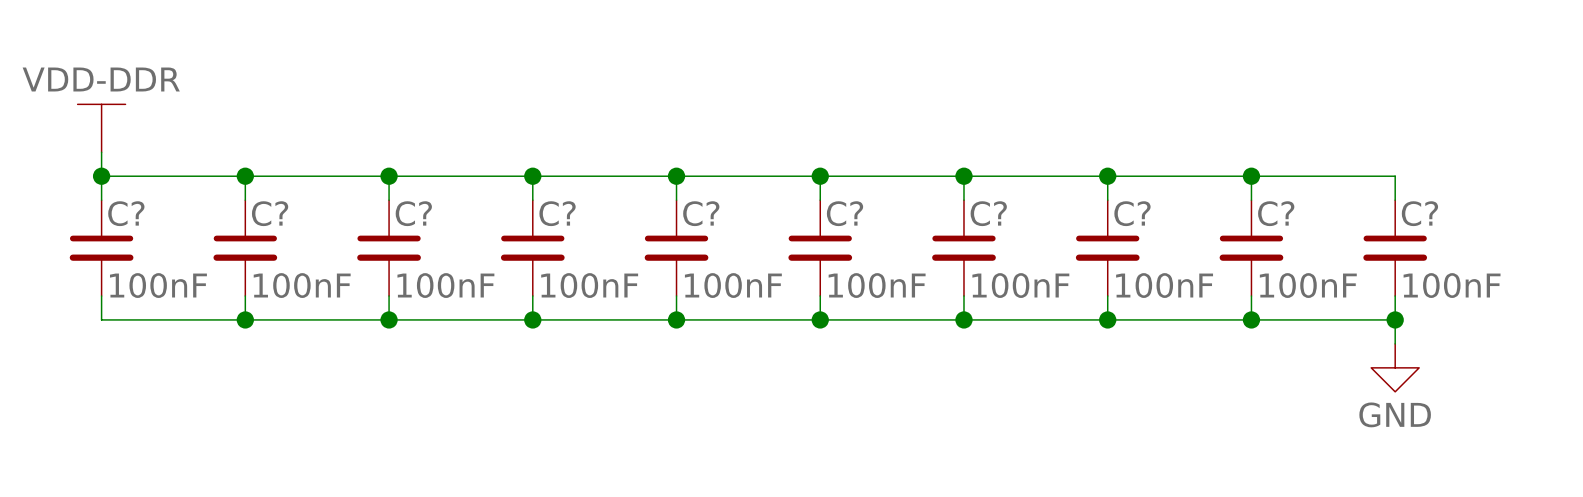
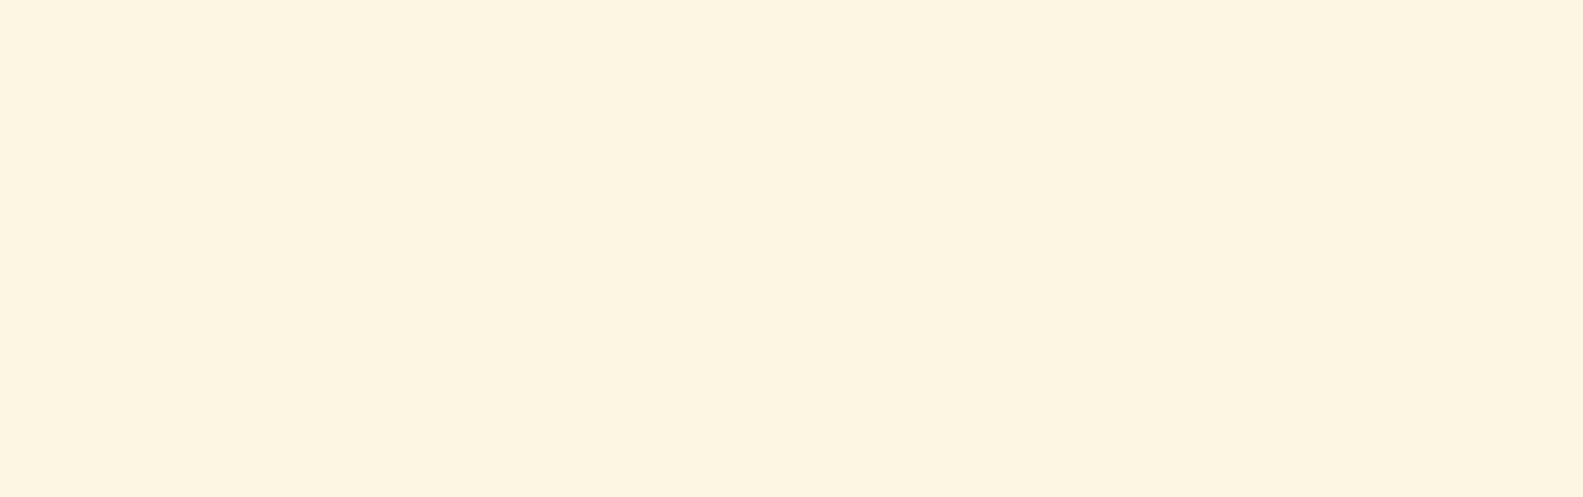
power symbol: VDD-DDR (101, 128) -> none
wire: (101, 152) (101, 200) -> none
wire: (101, 176) (1395, 176) (1395, 200) -> none
junction: (101, 176) -> none
wire: (245, 176) (245, 200) -> none
junction: (245, 176) -> none
wire: (389, 176) (389, 200) -> none
junction: (389, 176) -> none
wire: (532, 176) (532, 200) -> none
junction: (532, 176) -> none
wire: (676, 176) (676, 200) -> none
junction: (676, 176) -> none
wire: (820, 176) (820, 200) -> none
junction: (820, 176) -> none
wire: (963, 176) (963, 200) -> none
junction: (963, 176) -> none
wire: (1107, 176) (1107, 200) -> none
junction: (1107, 176) -> none
wire: (1251, 176) (1251, 200) -> none
junction: (1251, 176) -> none
C?: 100nF (101, 248) -> none
C?: 100nF (245, 248) -> none
C?: 100nF (389, 248) -> none
C?: 100nF (532, 248) -> none
C?: 100nF (676, 248) -> none
C?: 100nF (820, 248) -> none
C?: 100nF (963, 248) -> none
C?: 100nF (1107, 248) -> none
C?: 100nF (1251, 248) -> none
C?: 100nF (1395, 248) -> none
wire: (101, 296) (101, 319) (1395, 319) -> none
wire: (245, 296) (245, 319) -> none
wire: (389, 296) (389, 319) -> none
wire: (532, 296) (532, 319) -> none
wire: (676, 296) (676, 319) -> none
wire: (820, 296) (820, 319) -> none
wire: (963, 296) (963, 319) -> none
wire: (1107, 296) (1107, 319) -> none
wire: (1251, 296) (1251, 319) -> none
wire: (1395, 296) (1395, 343) -> none
junction: (245, 319) -> none
junction: (389, 319) -> none
junction: (532, 319) -> none
junction: (676, 319) -> none
junction: (820, 319) -> none
junction: (963, 319) -> none
junction: (1107, 319) -> none
junction: (1251, 319) -> none
junction: (1395, 319) -> none
power symbol: GND (1395, 367) -> none

